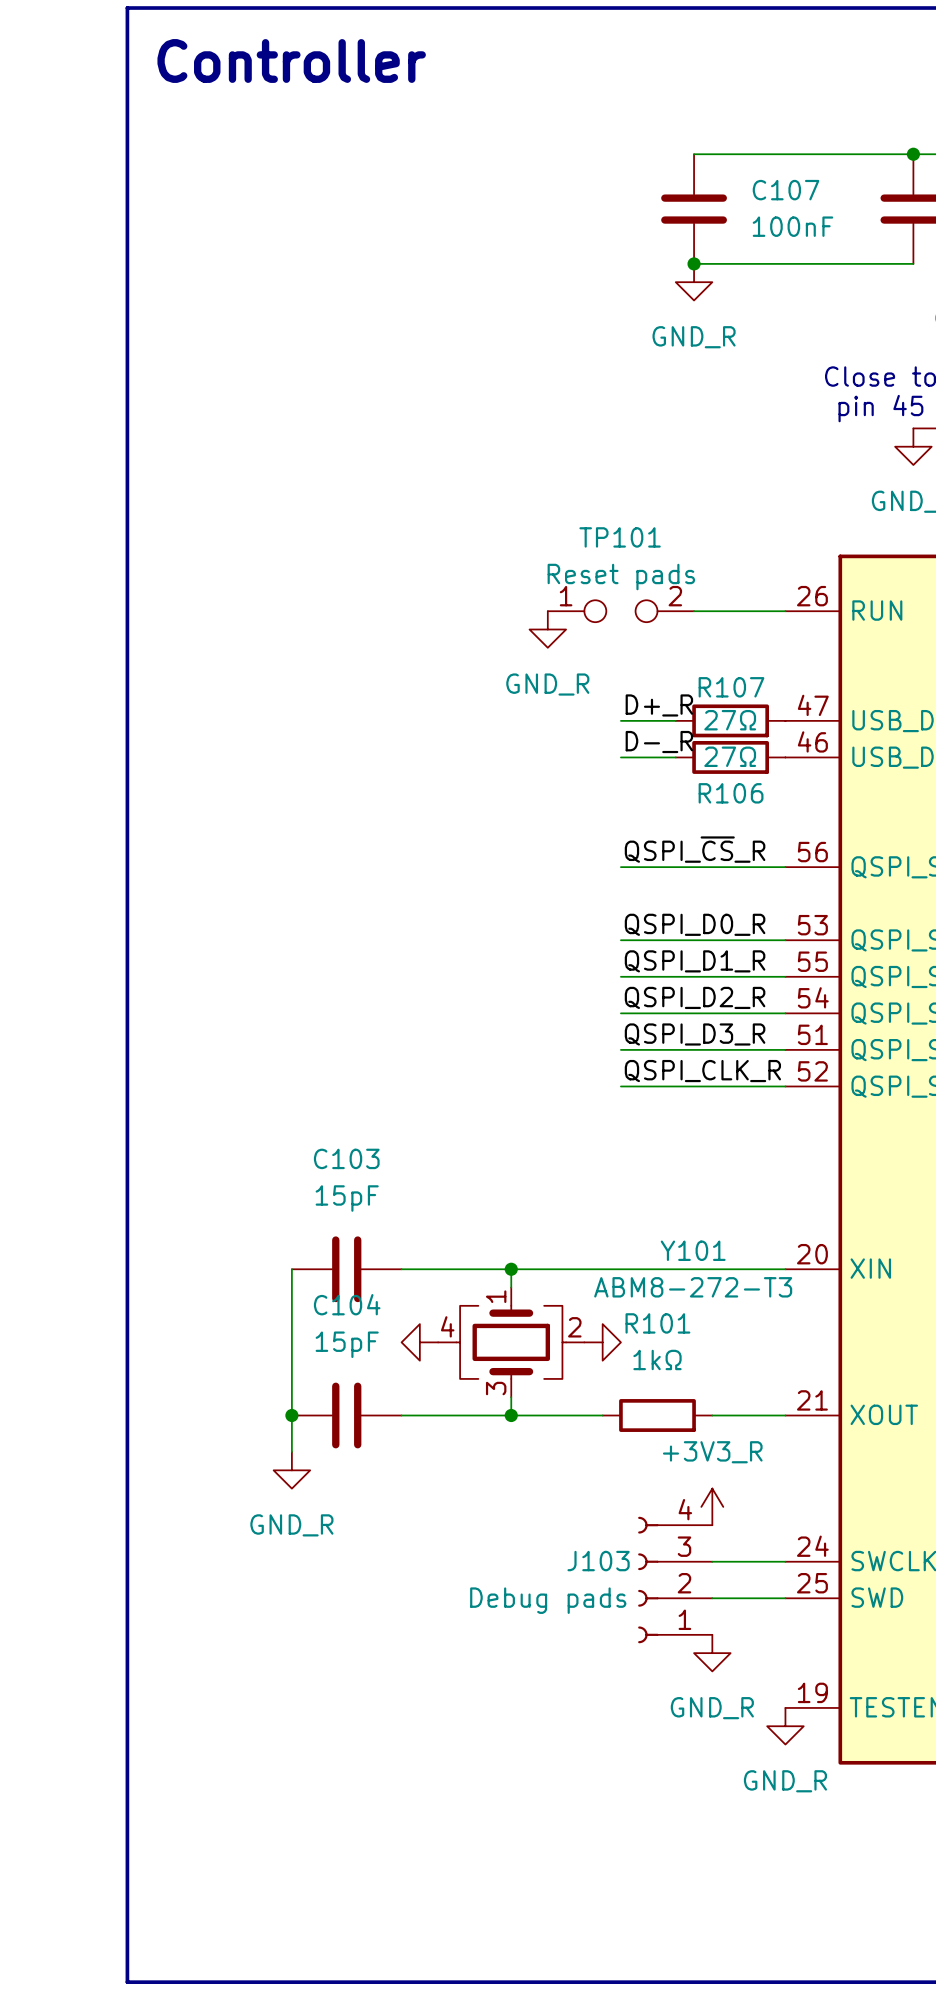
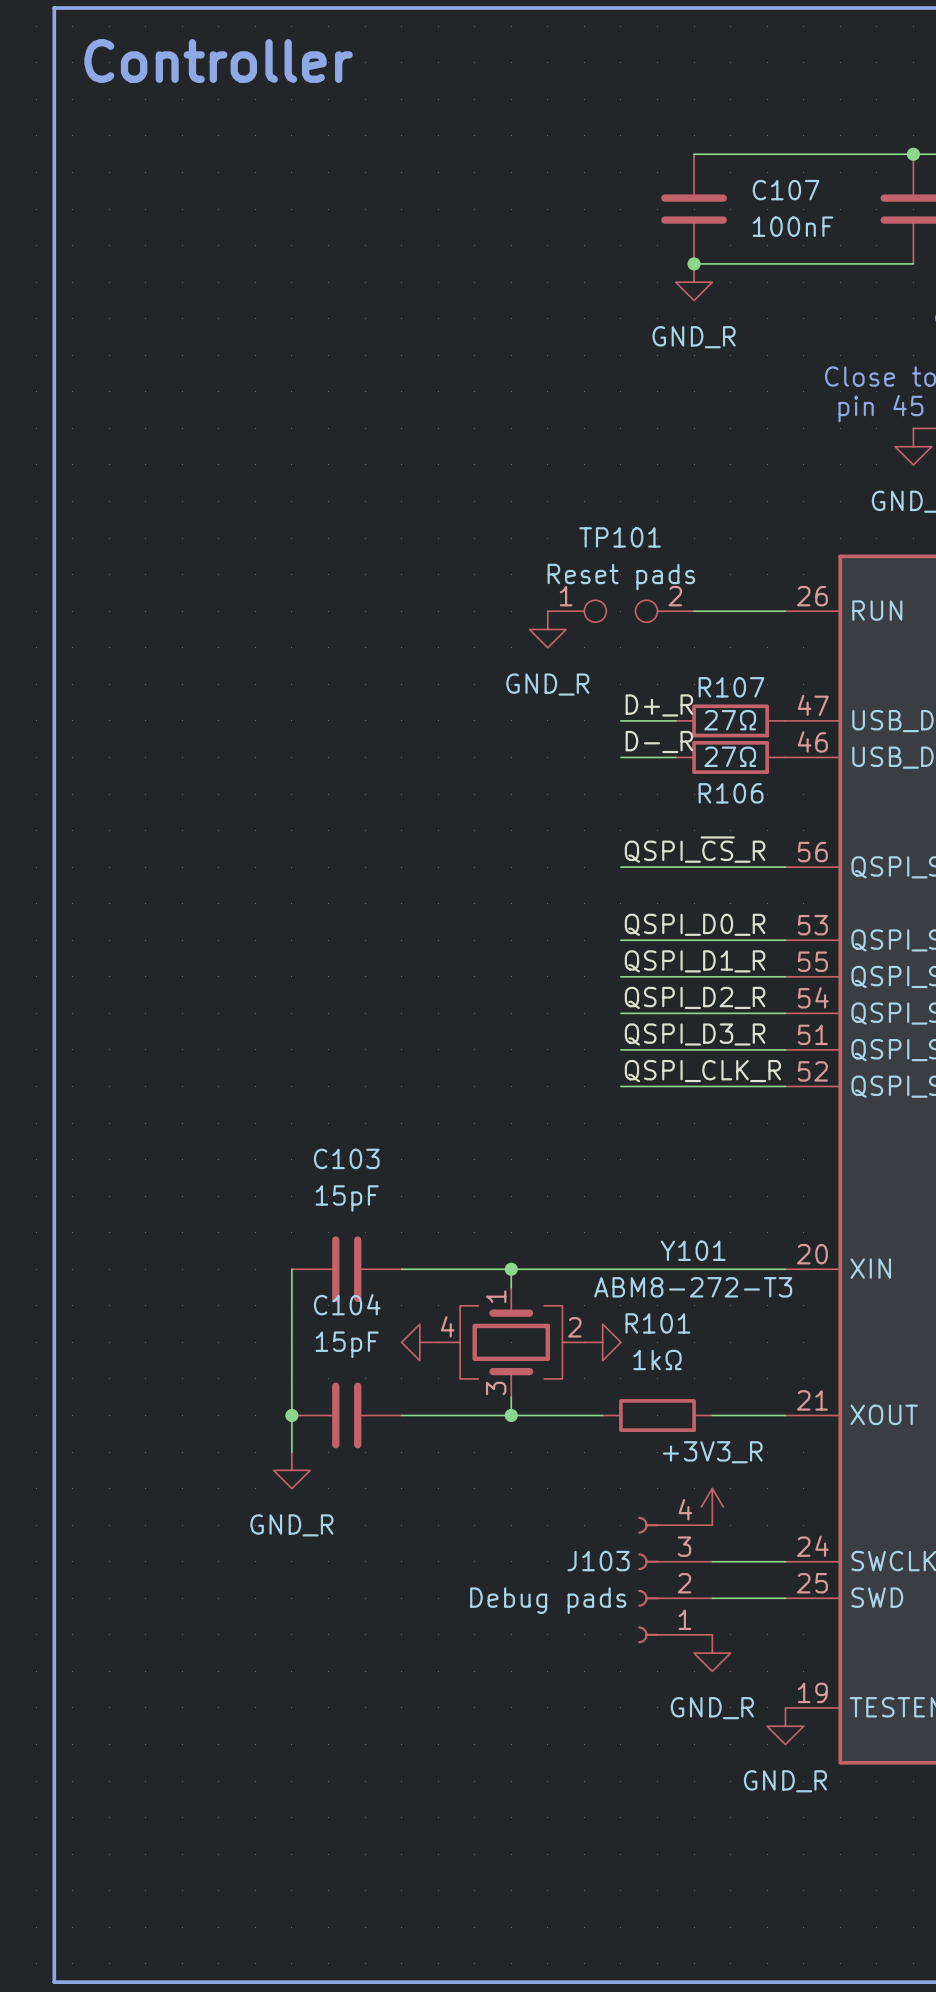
line: (127, 8) (127, 1982) -> (127, 8) (54, 8) (54, 1982) (127, 1982)
text position: Controller (291, 60) -> Controller (218, 60)

